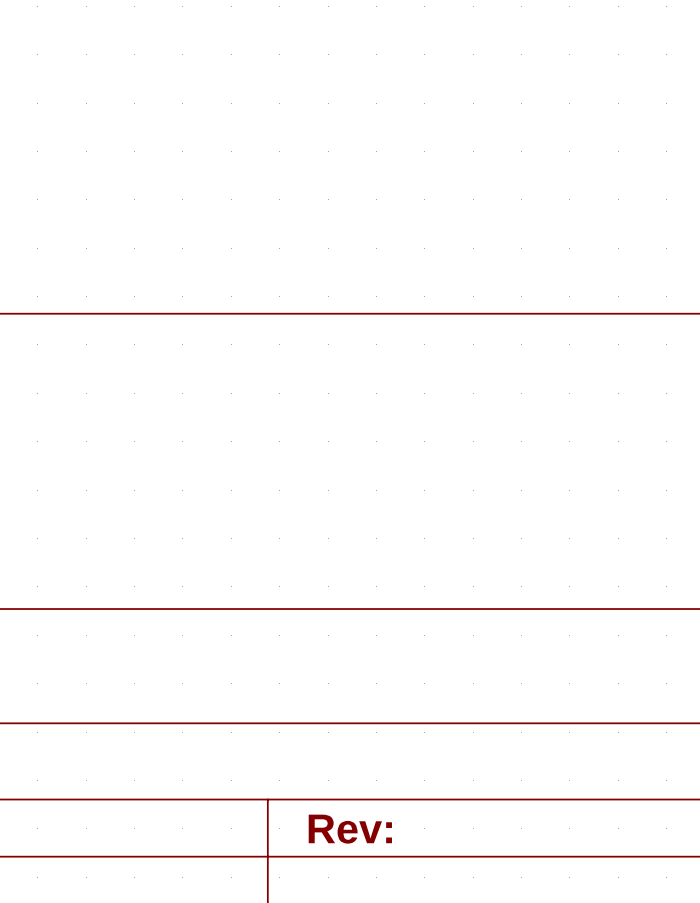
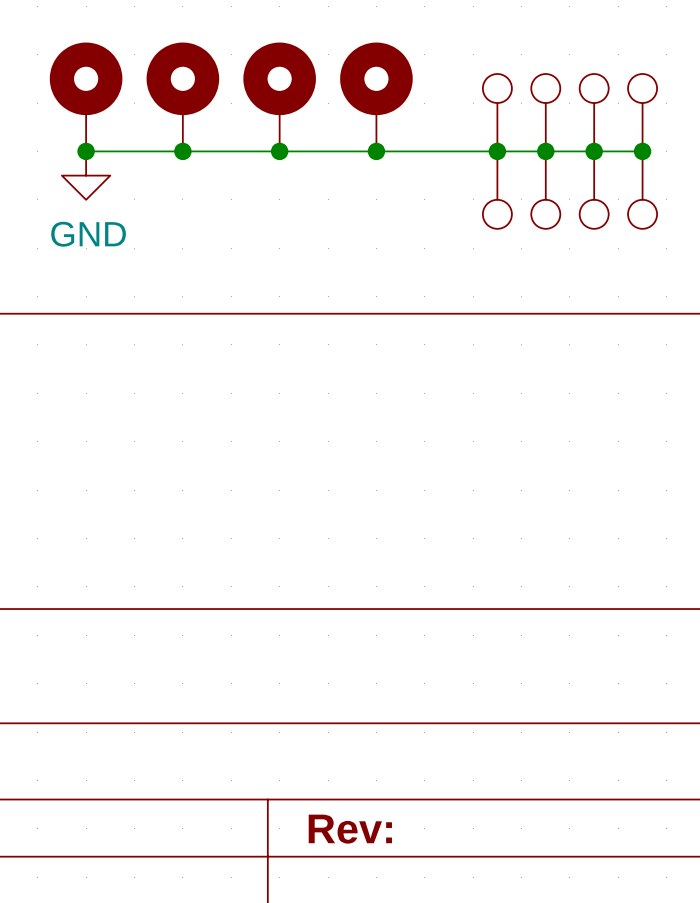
part: none -> (86, 96)
part: none -> (182, 96)
part: none -> (279, 96)
part: none -> (376, 96)
part: none -> (497, 112)
part: none -> (545, 112)
part: none -> (594, 112)
part: none -> (642, 112)
wire: none -> (86, 151) (642, 151)
junction: none -> (86, 151)
junction: none -> (182, 151)
junction: none -> (279, 151)
junction: none -> (376, 151)
junction: none -> (497, 151)
junction: none -> (545, 151)
junction: none -> (594, 151)
junction: none -> (642, 151)
power symbol: none -> GND (86, 175)
part: none -> (497, 190)
part: none -> (545, 190)
part: none -> (594, 190)
part: none -> (642, 190)

